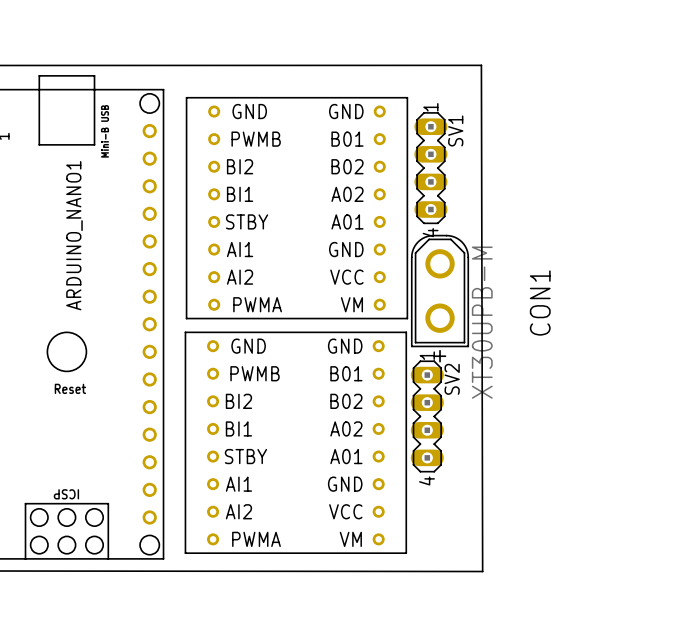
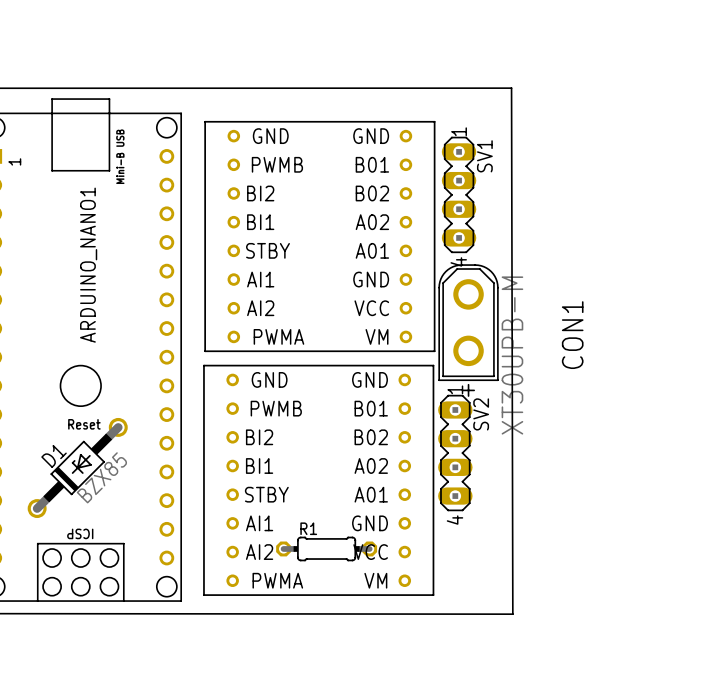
D1: none -> BZX85 (77, 467)
R1: none -> (326, 548)

